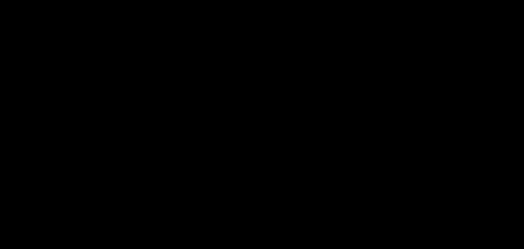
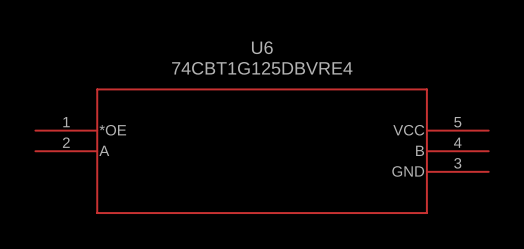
U6: none -> 74CBT1G125DBVRE4 (262, 151)

